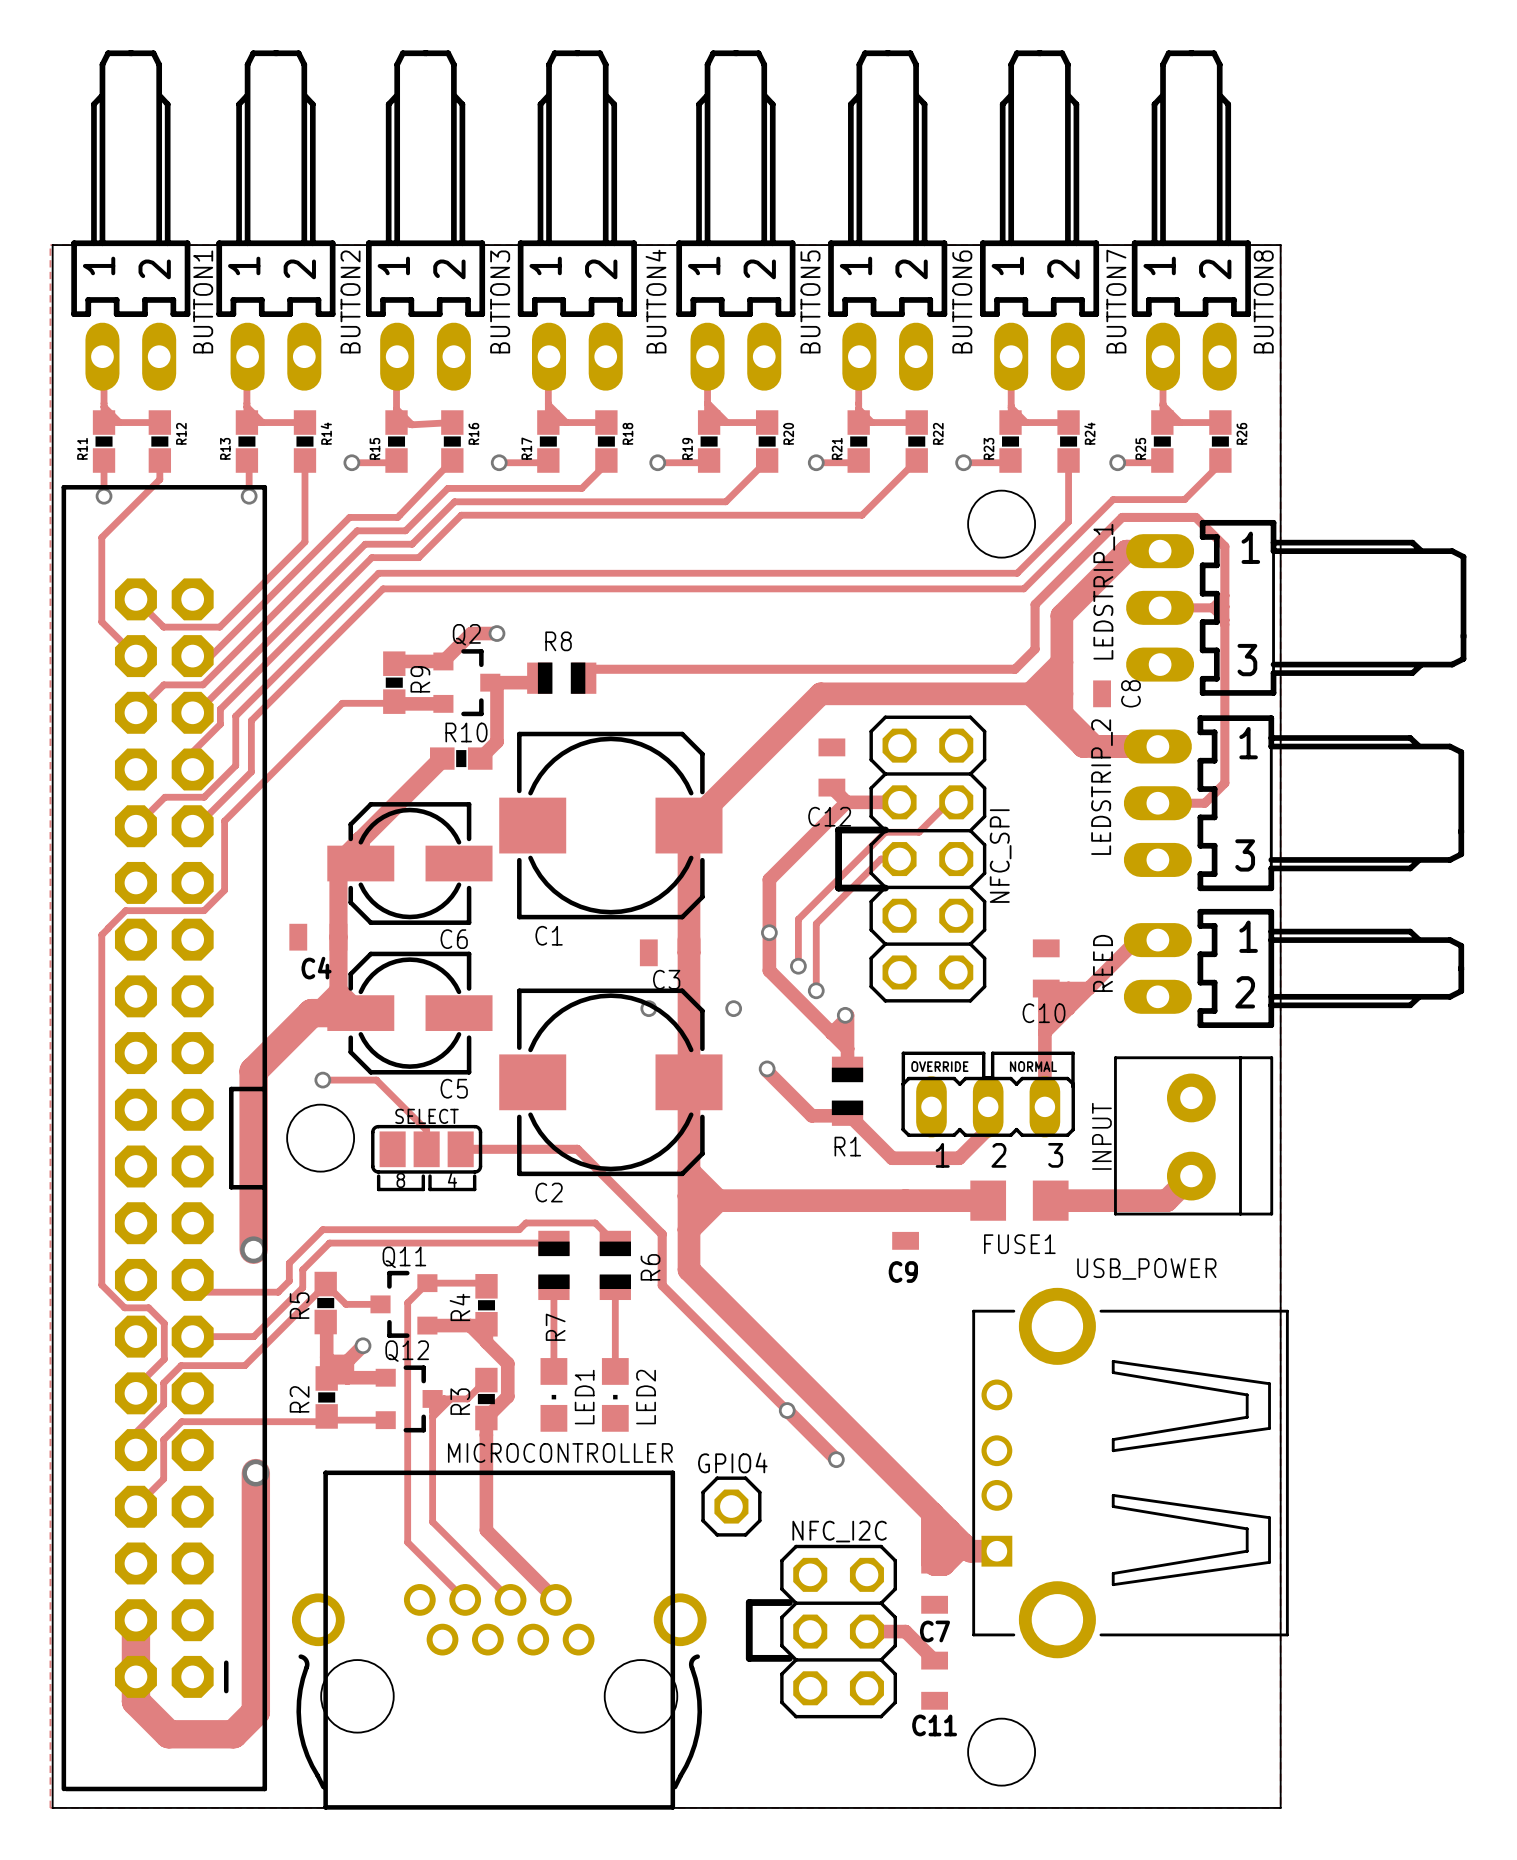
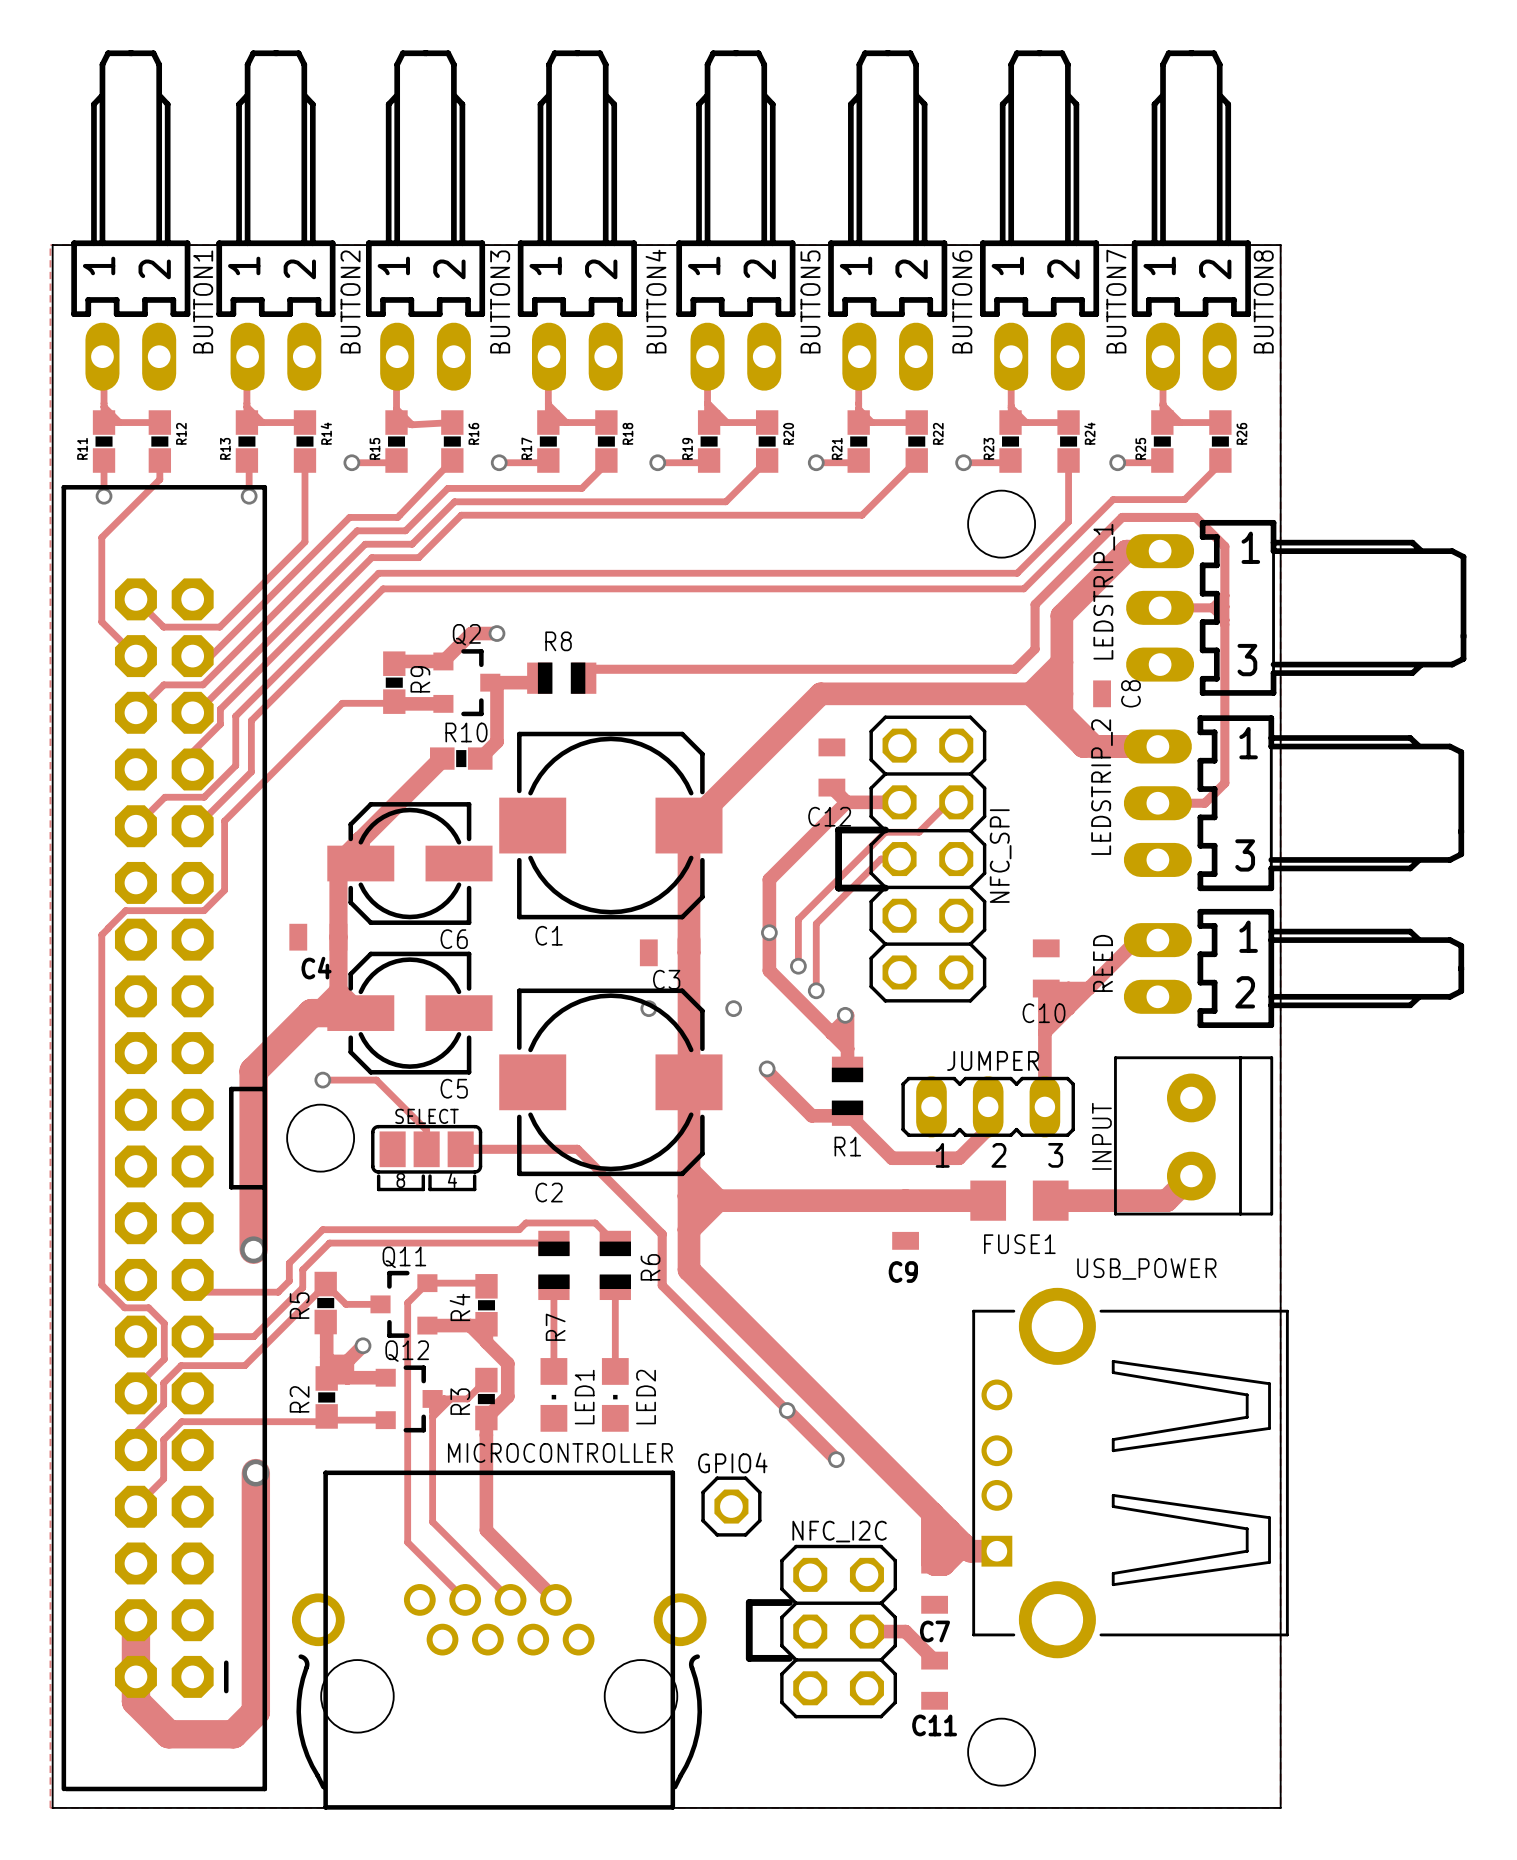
JUMPER name: none -> JUMPER (993, 1060)
text: OVERRIDE (939, 1066) -> none
text: NORMAL (1033, 1066) -> none
line: (903, 1084) (903, 1053) (983, 1053) (983, 1077) (992, 1077) (992, 1053) (1073, 1053) (1073, 1086) -> none

